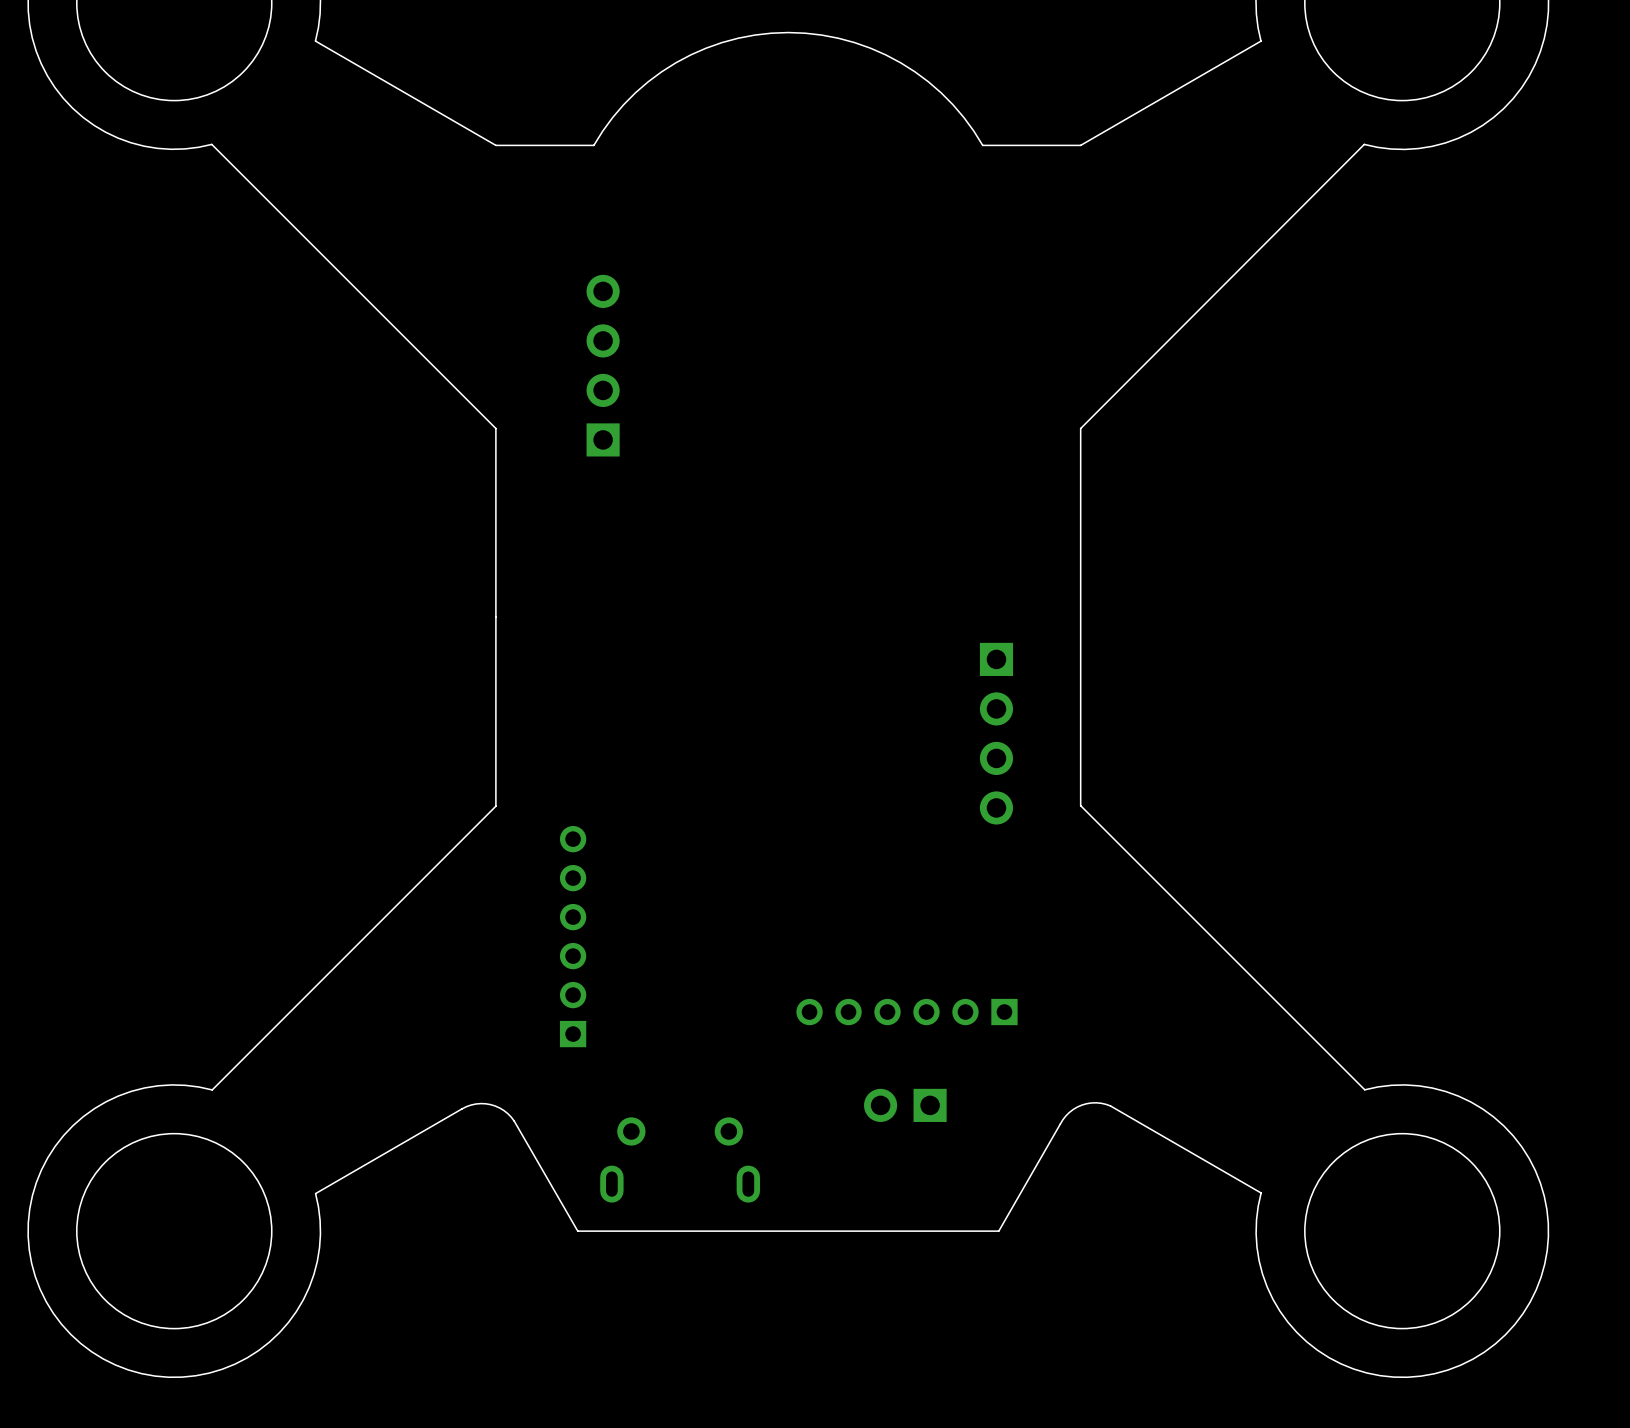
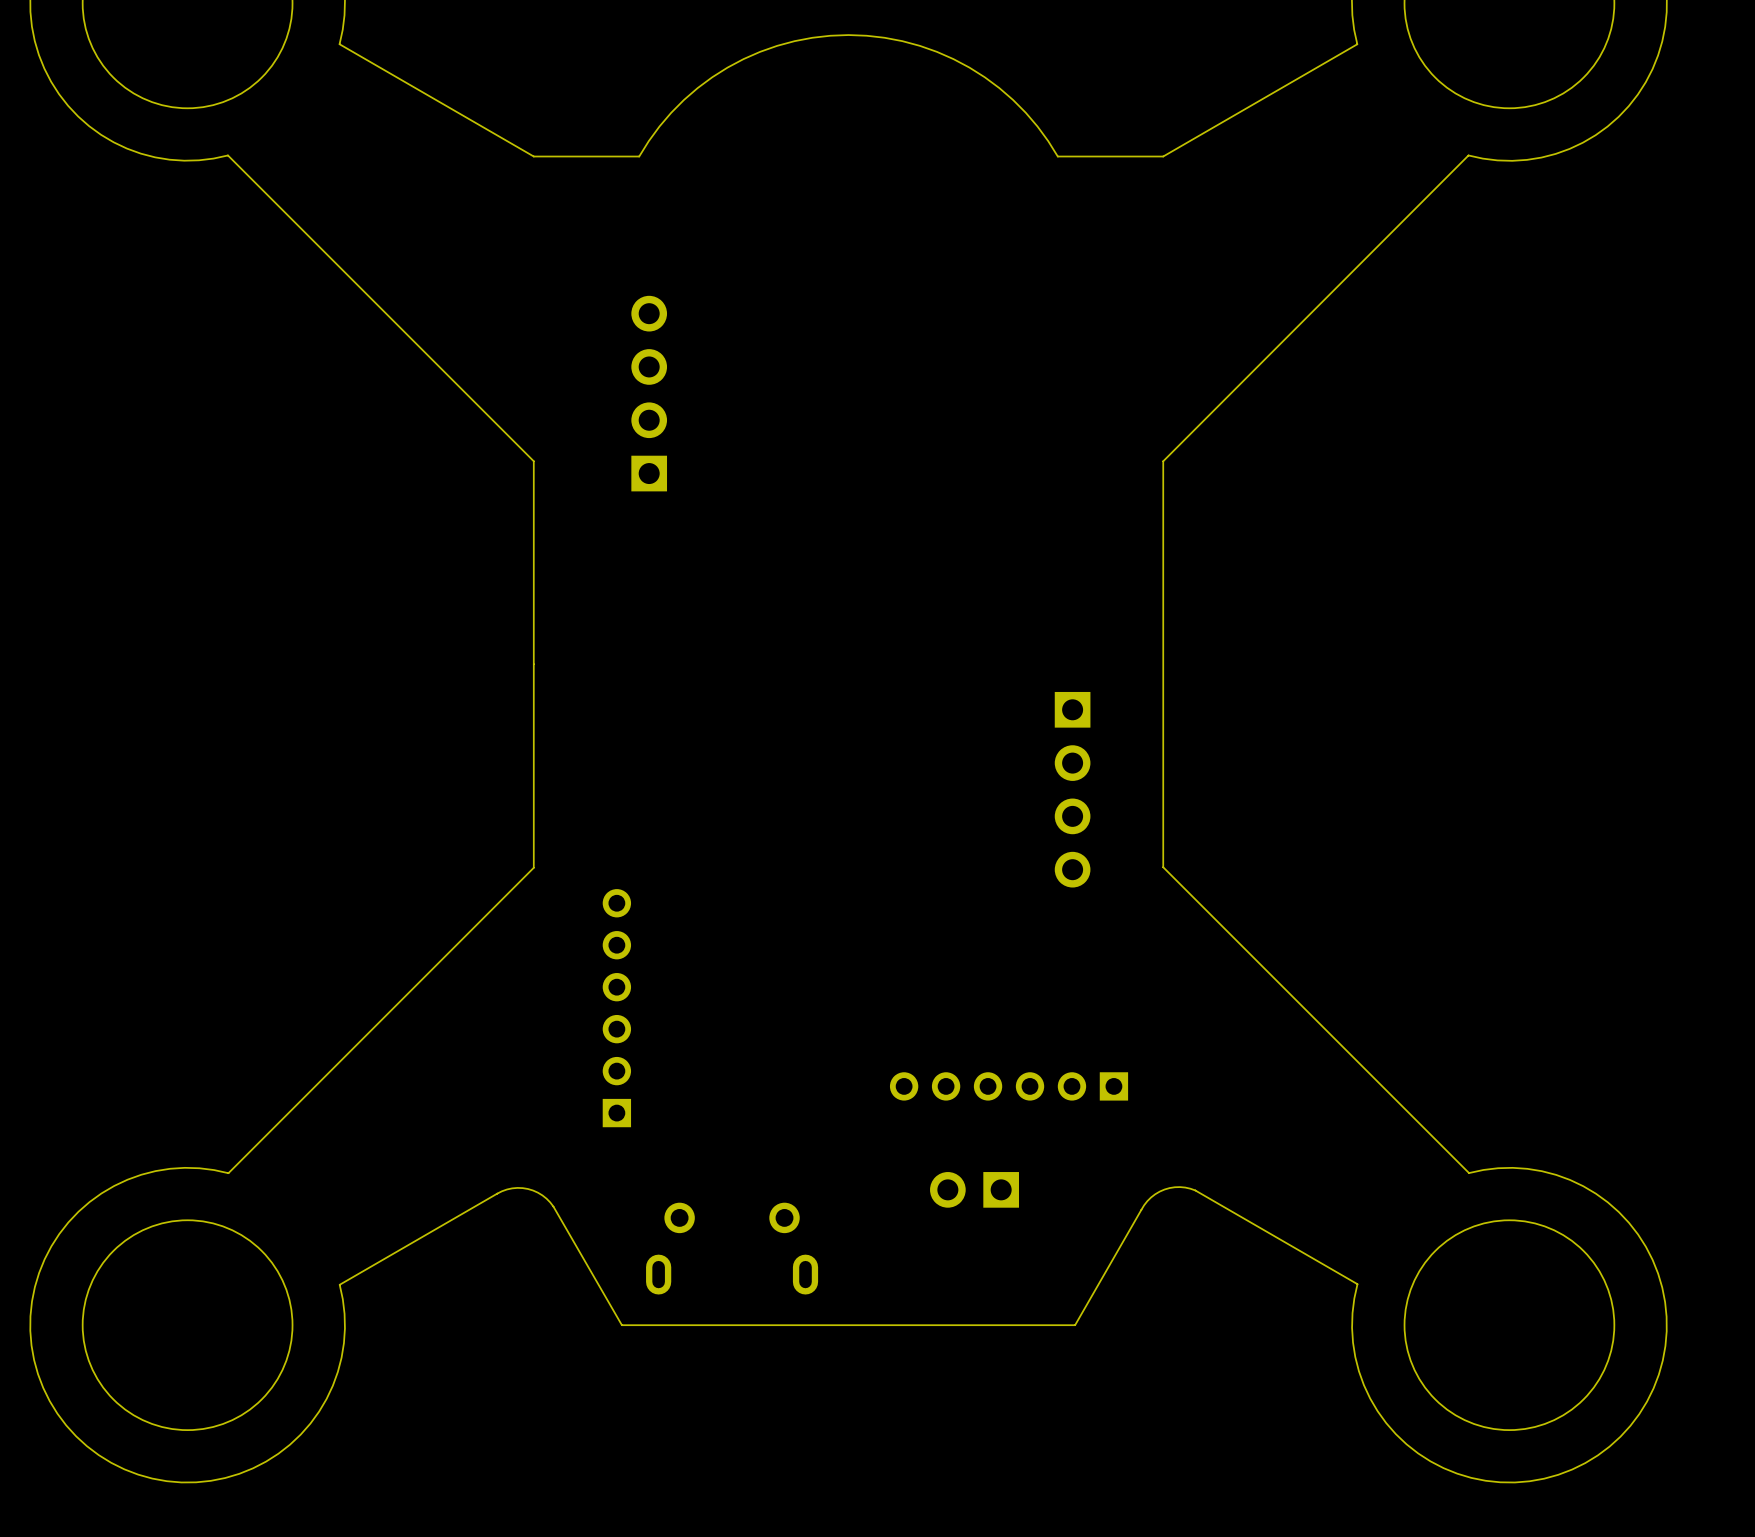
part position: (907, 1012) -> (1009, 1086)

